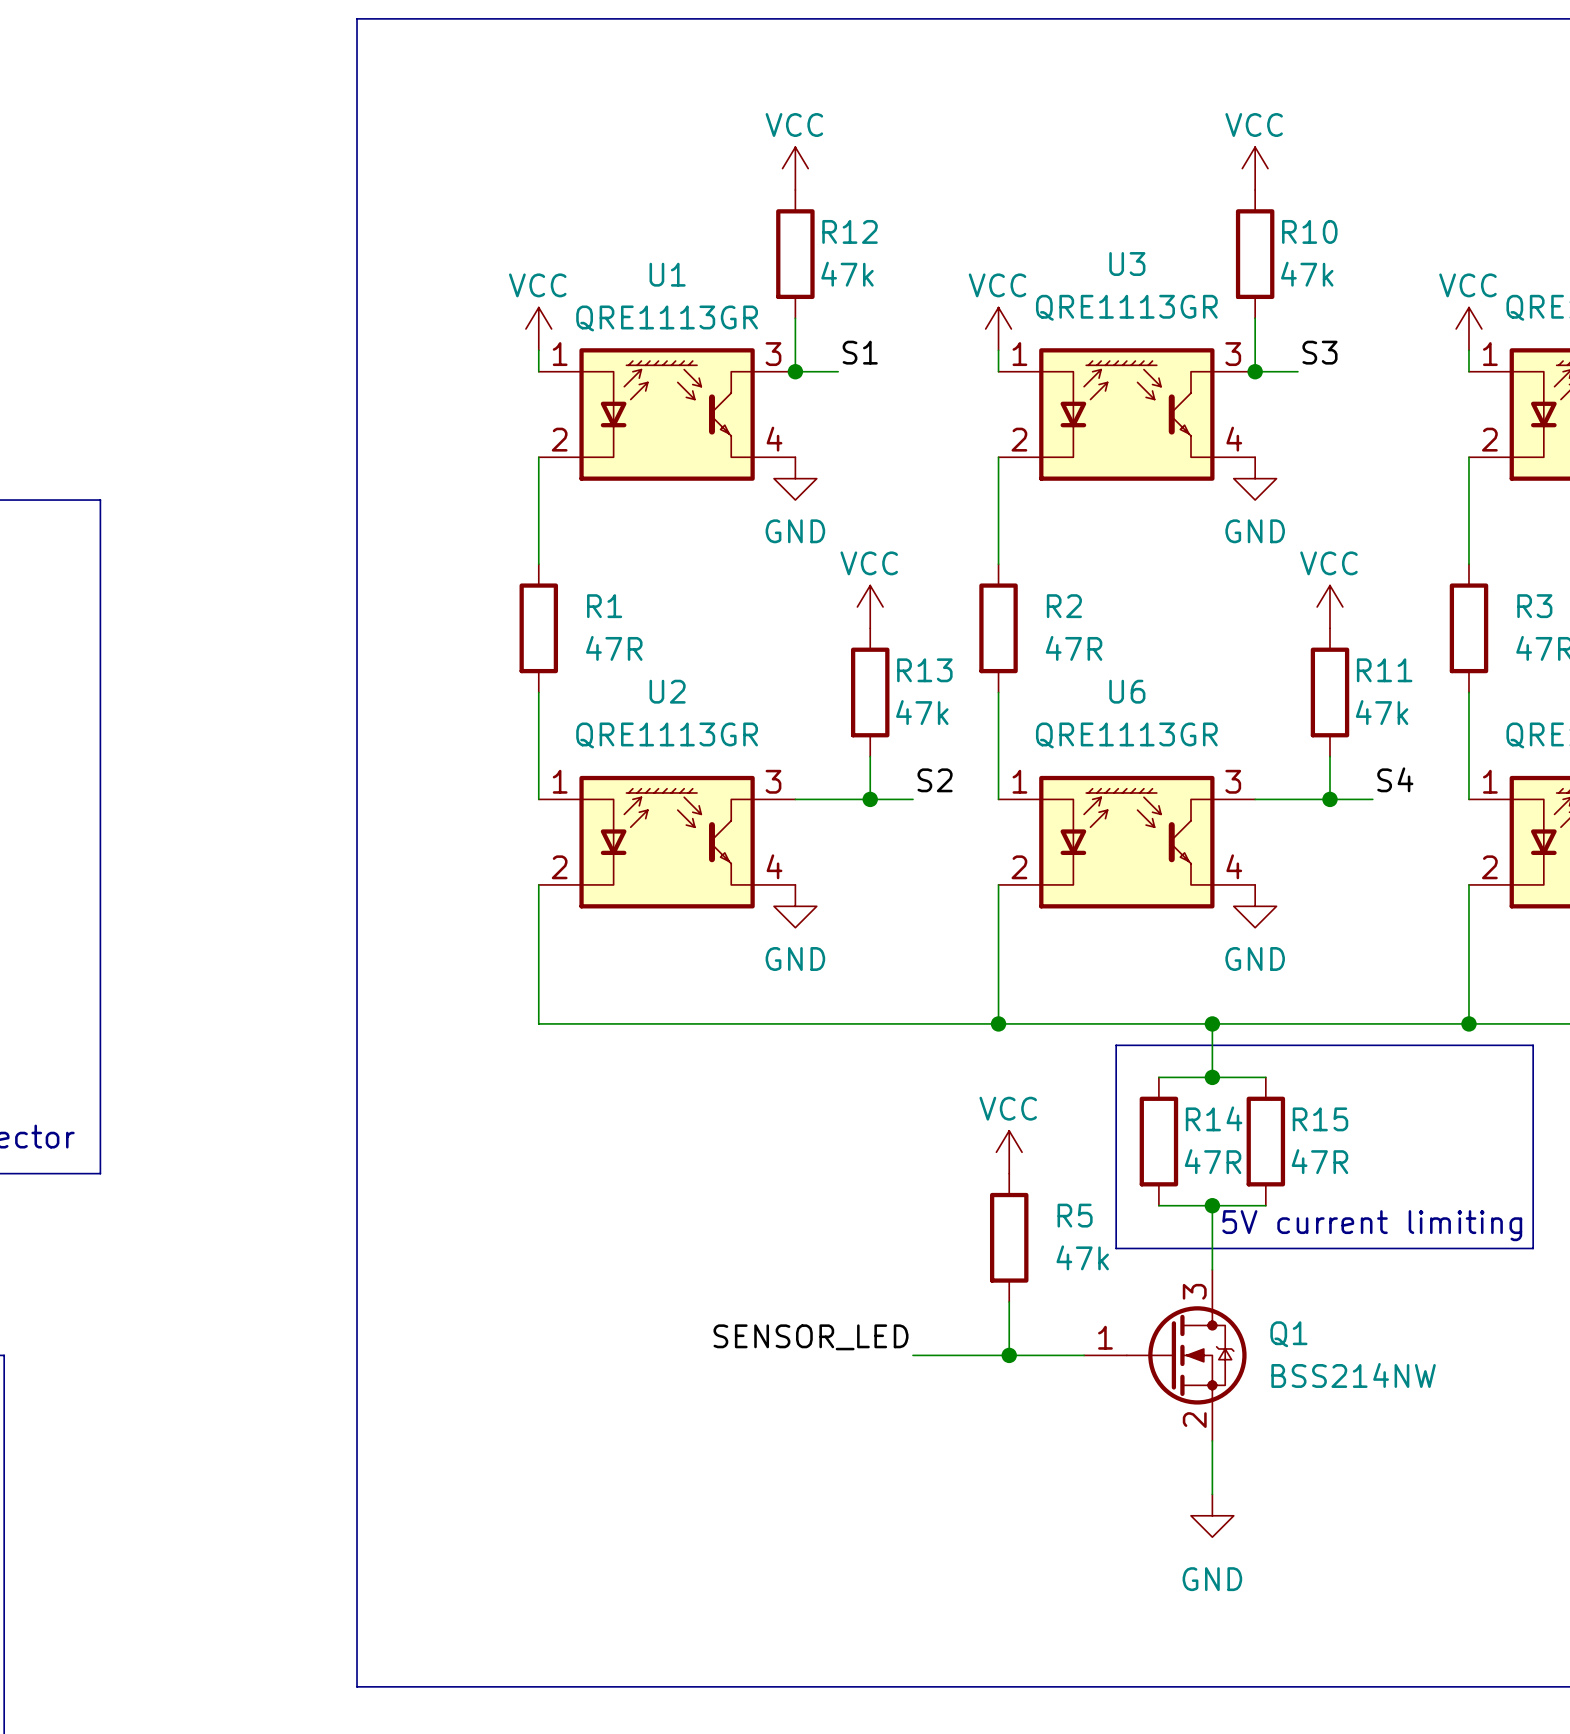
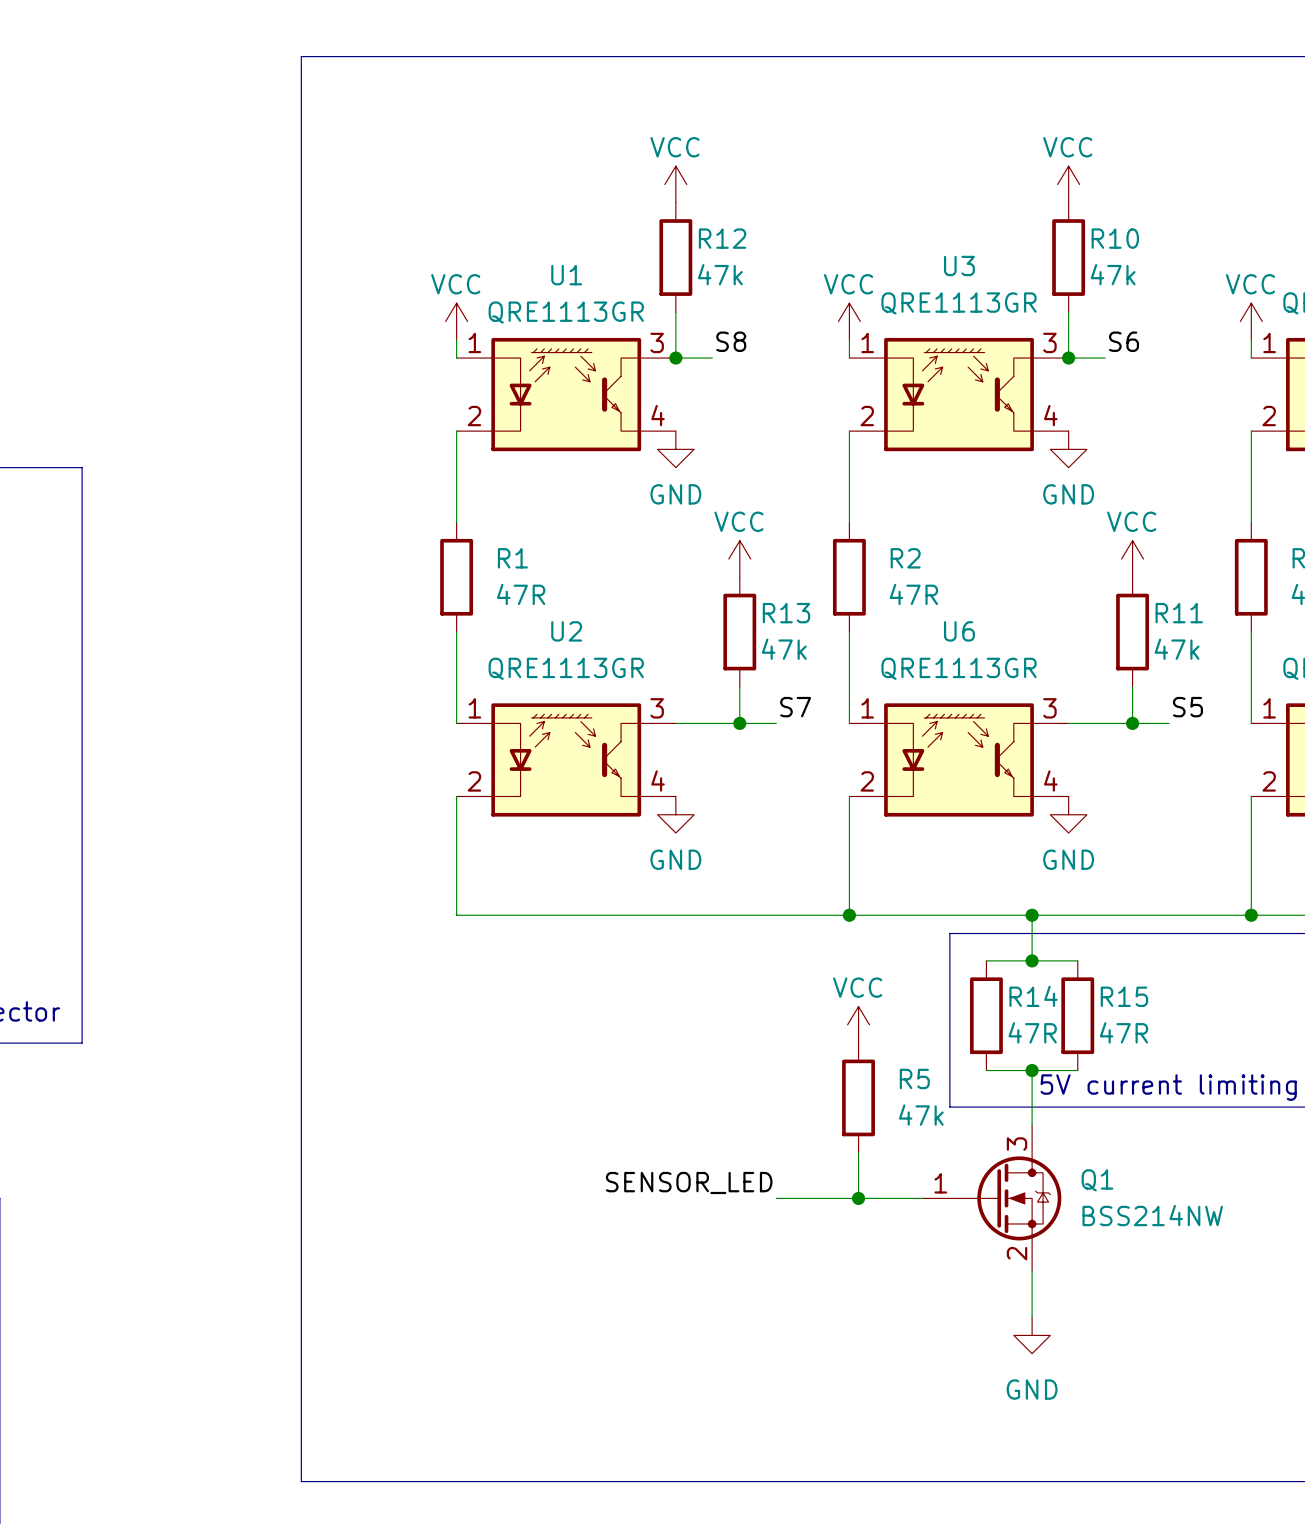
label: S1 (860, 352) -> S8 (731, 341)
label: S3 (1319, 352) -> S6 (1124, 341)
label: S4 (1395, 779) -> S5 (1187, 707)
label: S2 (935, 780) -> S7 (795, 707)

